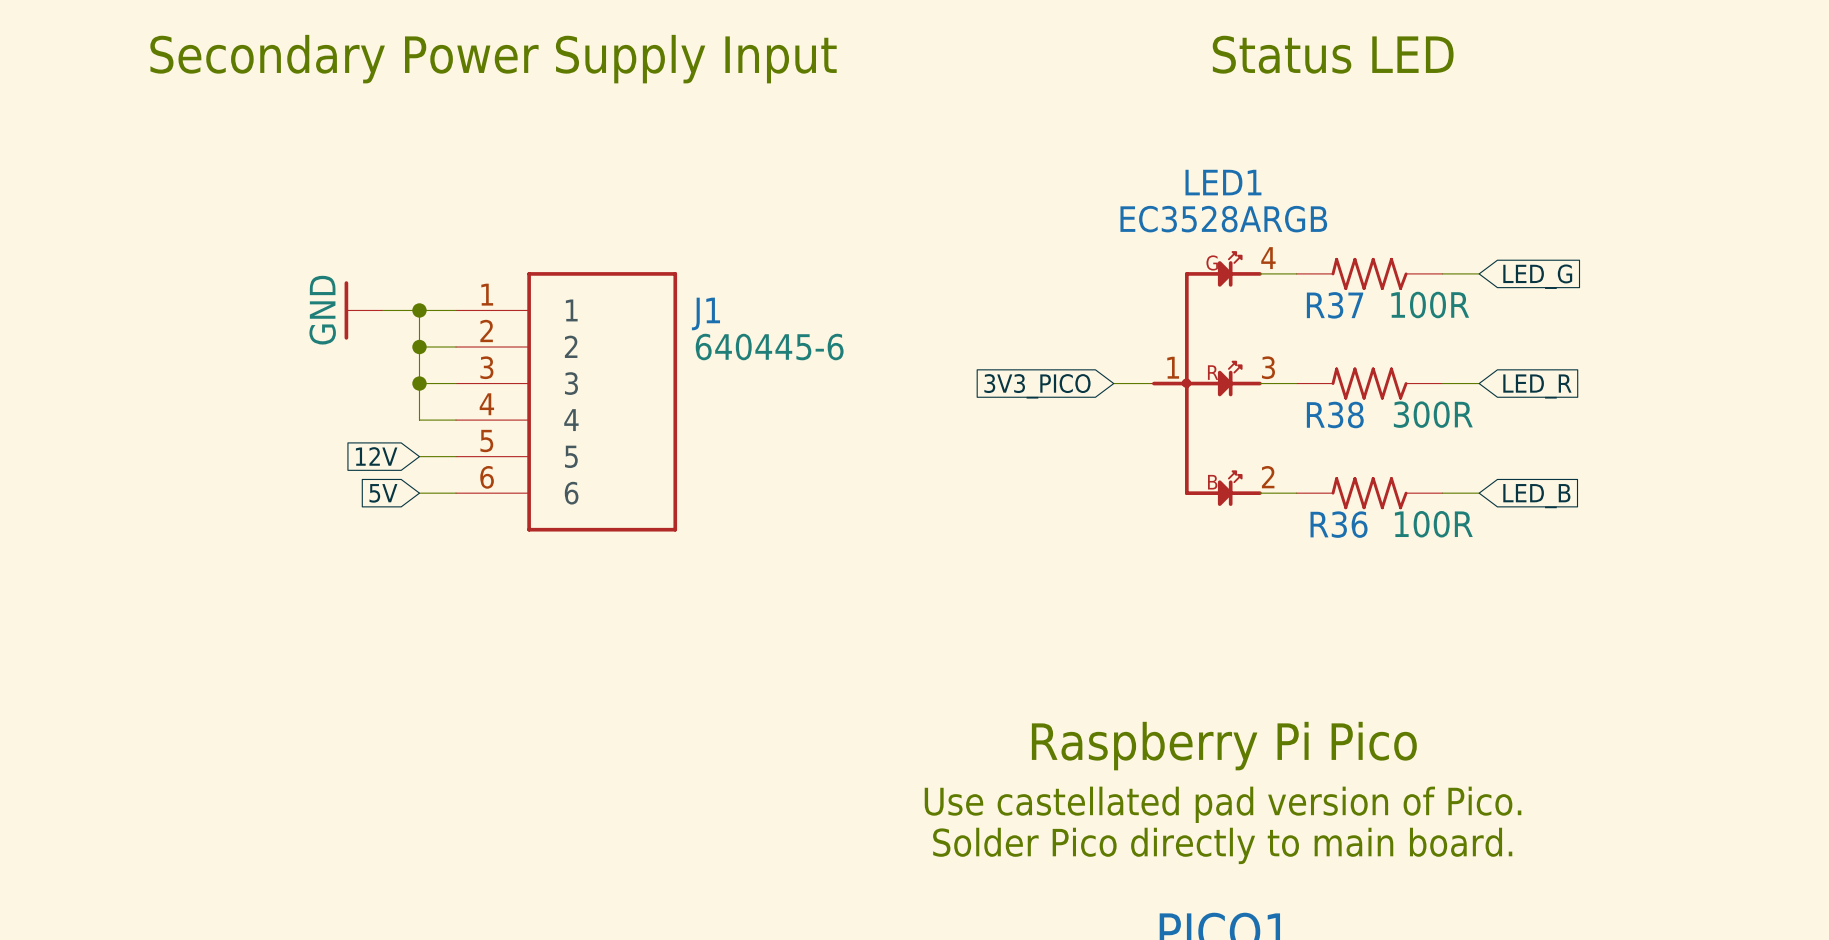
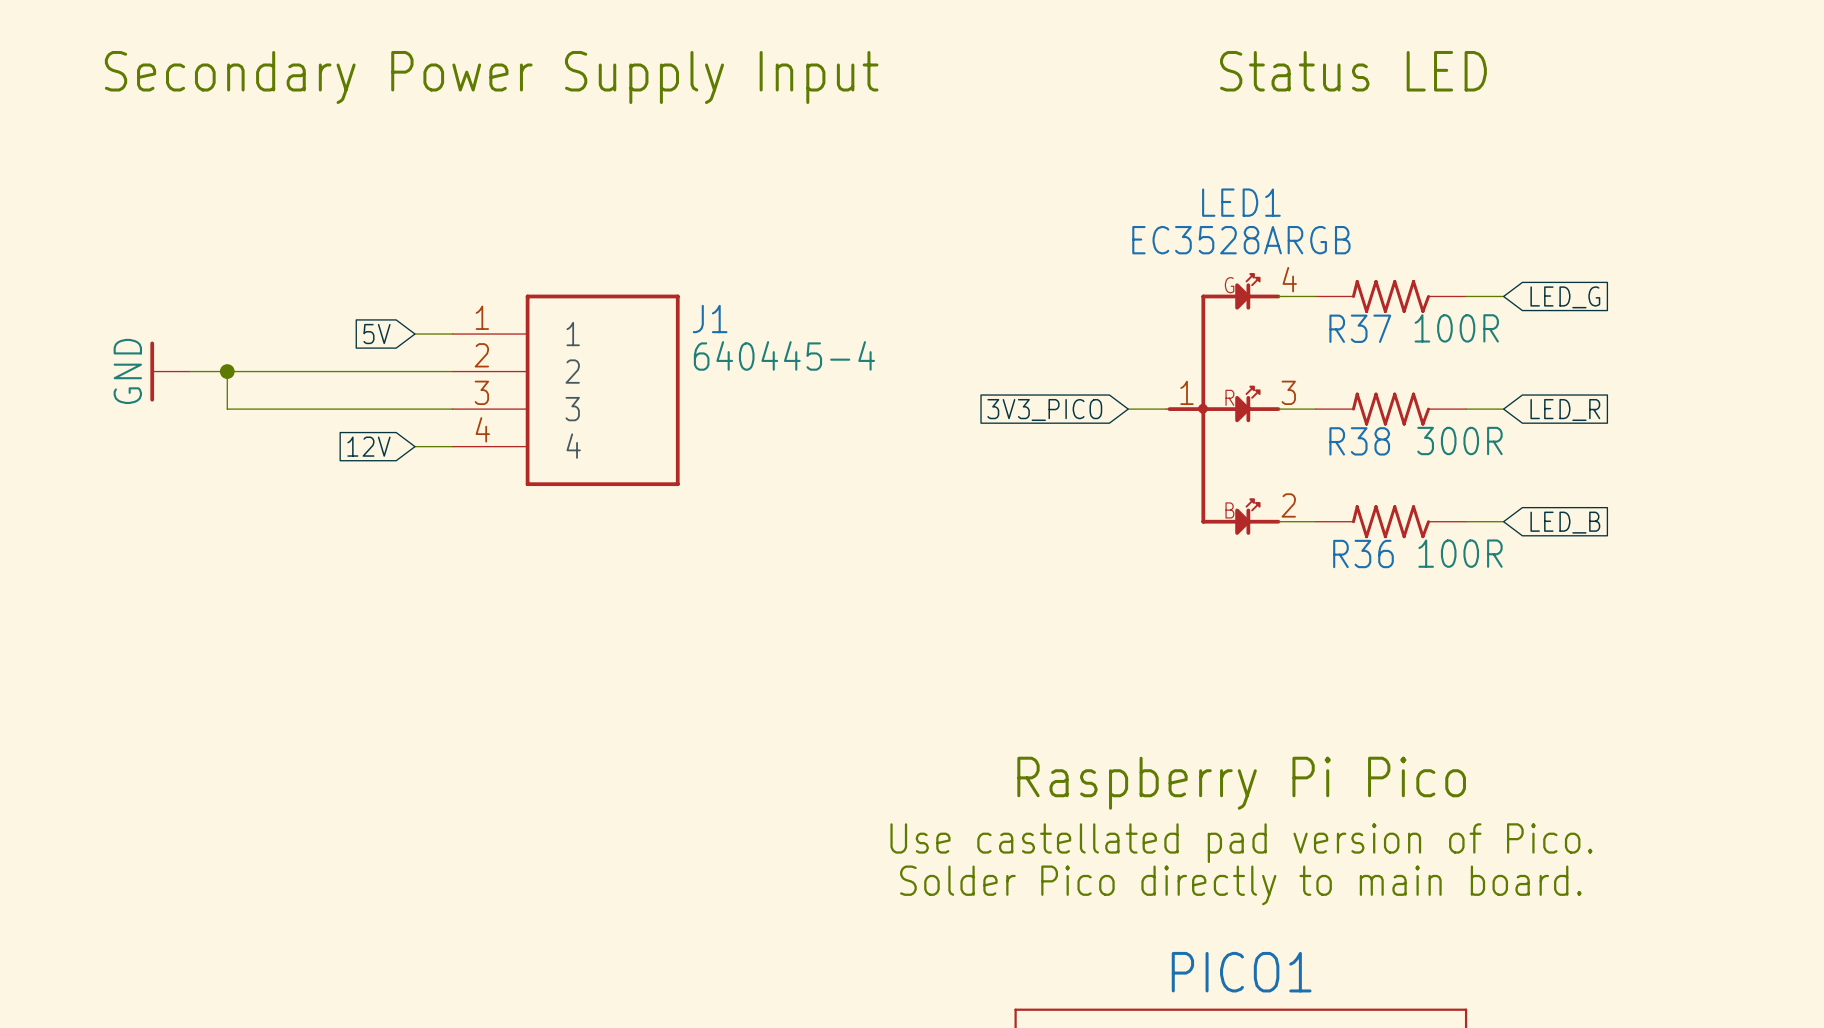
J1 symbol: [456, 272, 678, 532] -> [452, 294, 680, 487]
power symbol position: GND (363, 310) -> GND (170, 371)
wire: (382, 310) (419, 310) (419, 420) -> none
junction: (419, 310) -> none
wire: none -> (189, 371) (414, 371)
wire: none -> (227, 371) (227, 409) (414, 409)
junction: none -> (227, 371)
junction: (419, 347) -> none
J1 value: 640445-6 (769, 347) -> 640445-4 (784, 355)
junction: (419, 383) -> none
global label position: 12V (376, 456) -> 12V (368, 446)
wire: (419, 456) (456, 456) -> none
global label position: 5V (383, 493) -> 5V (376, 334)
wire: (419, 493) (456, 493) -> none

